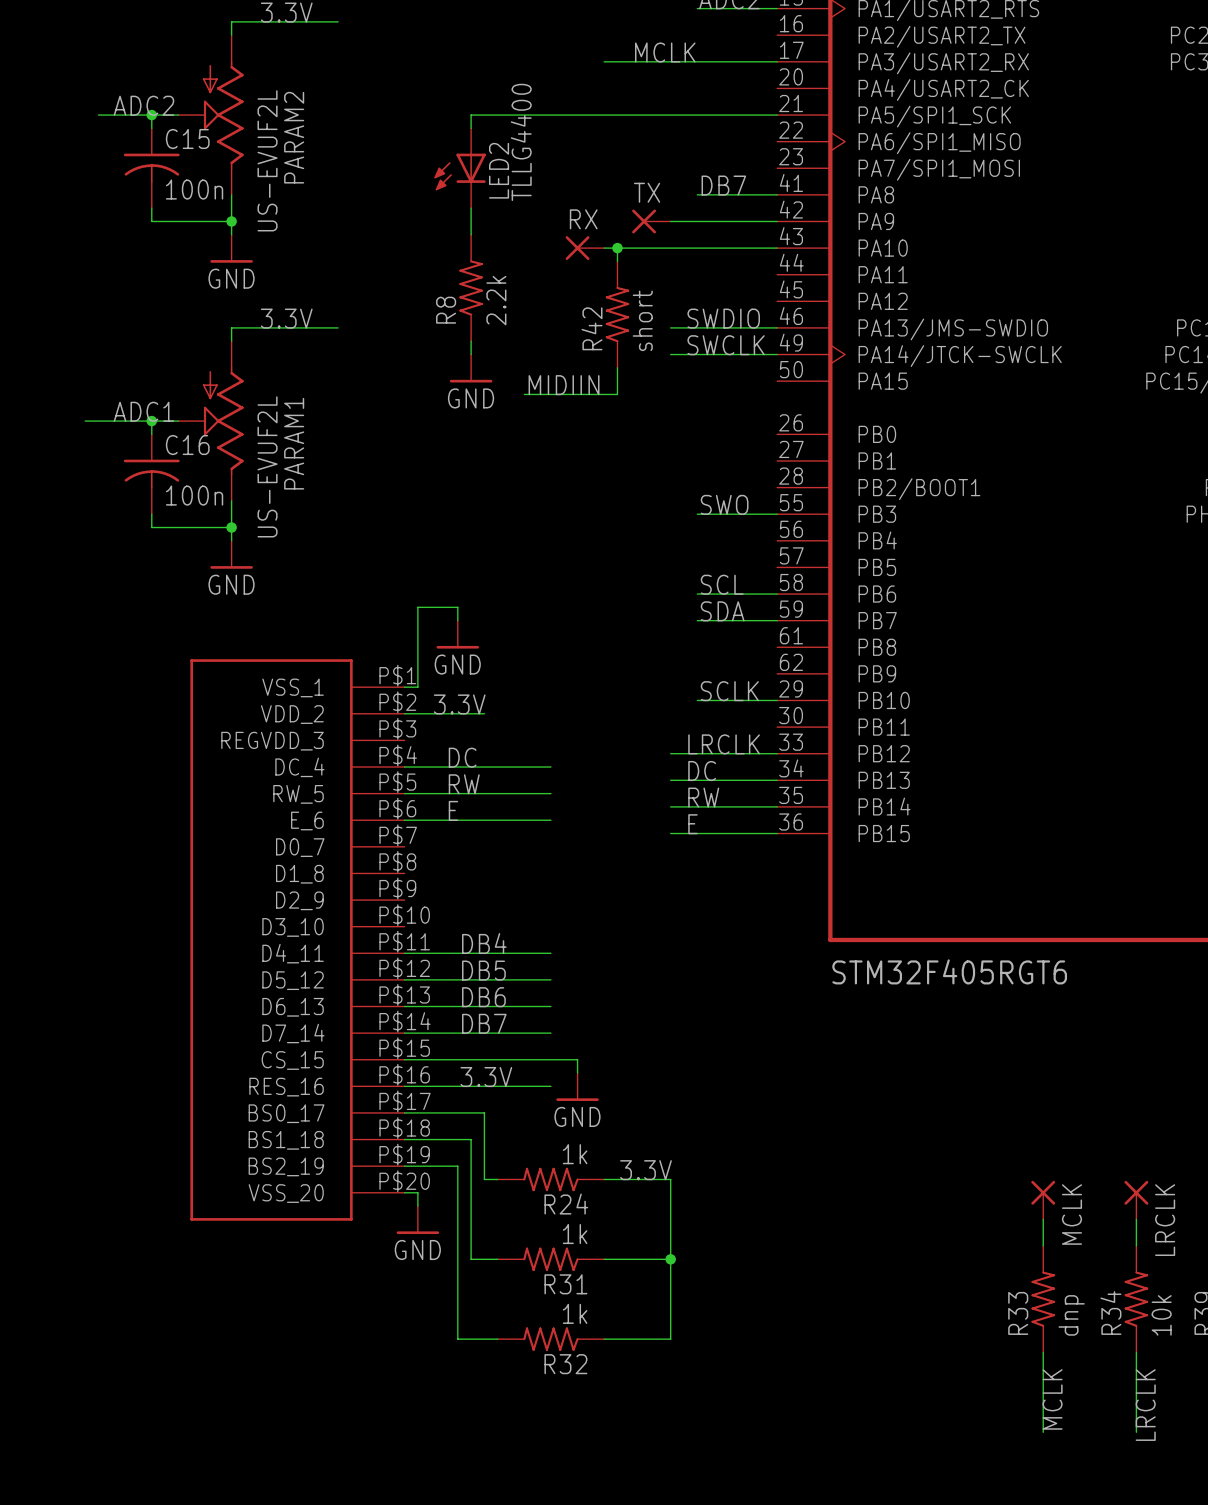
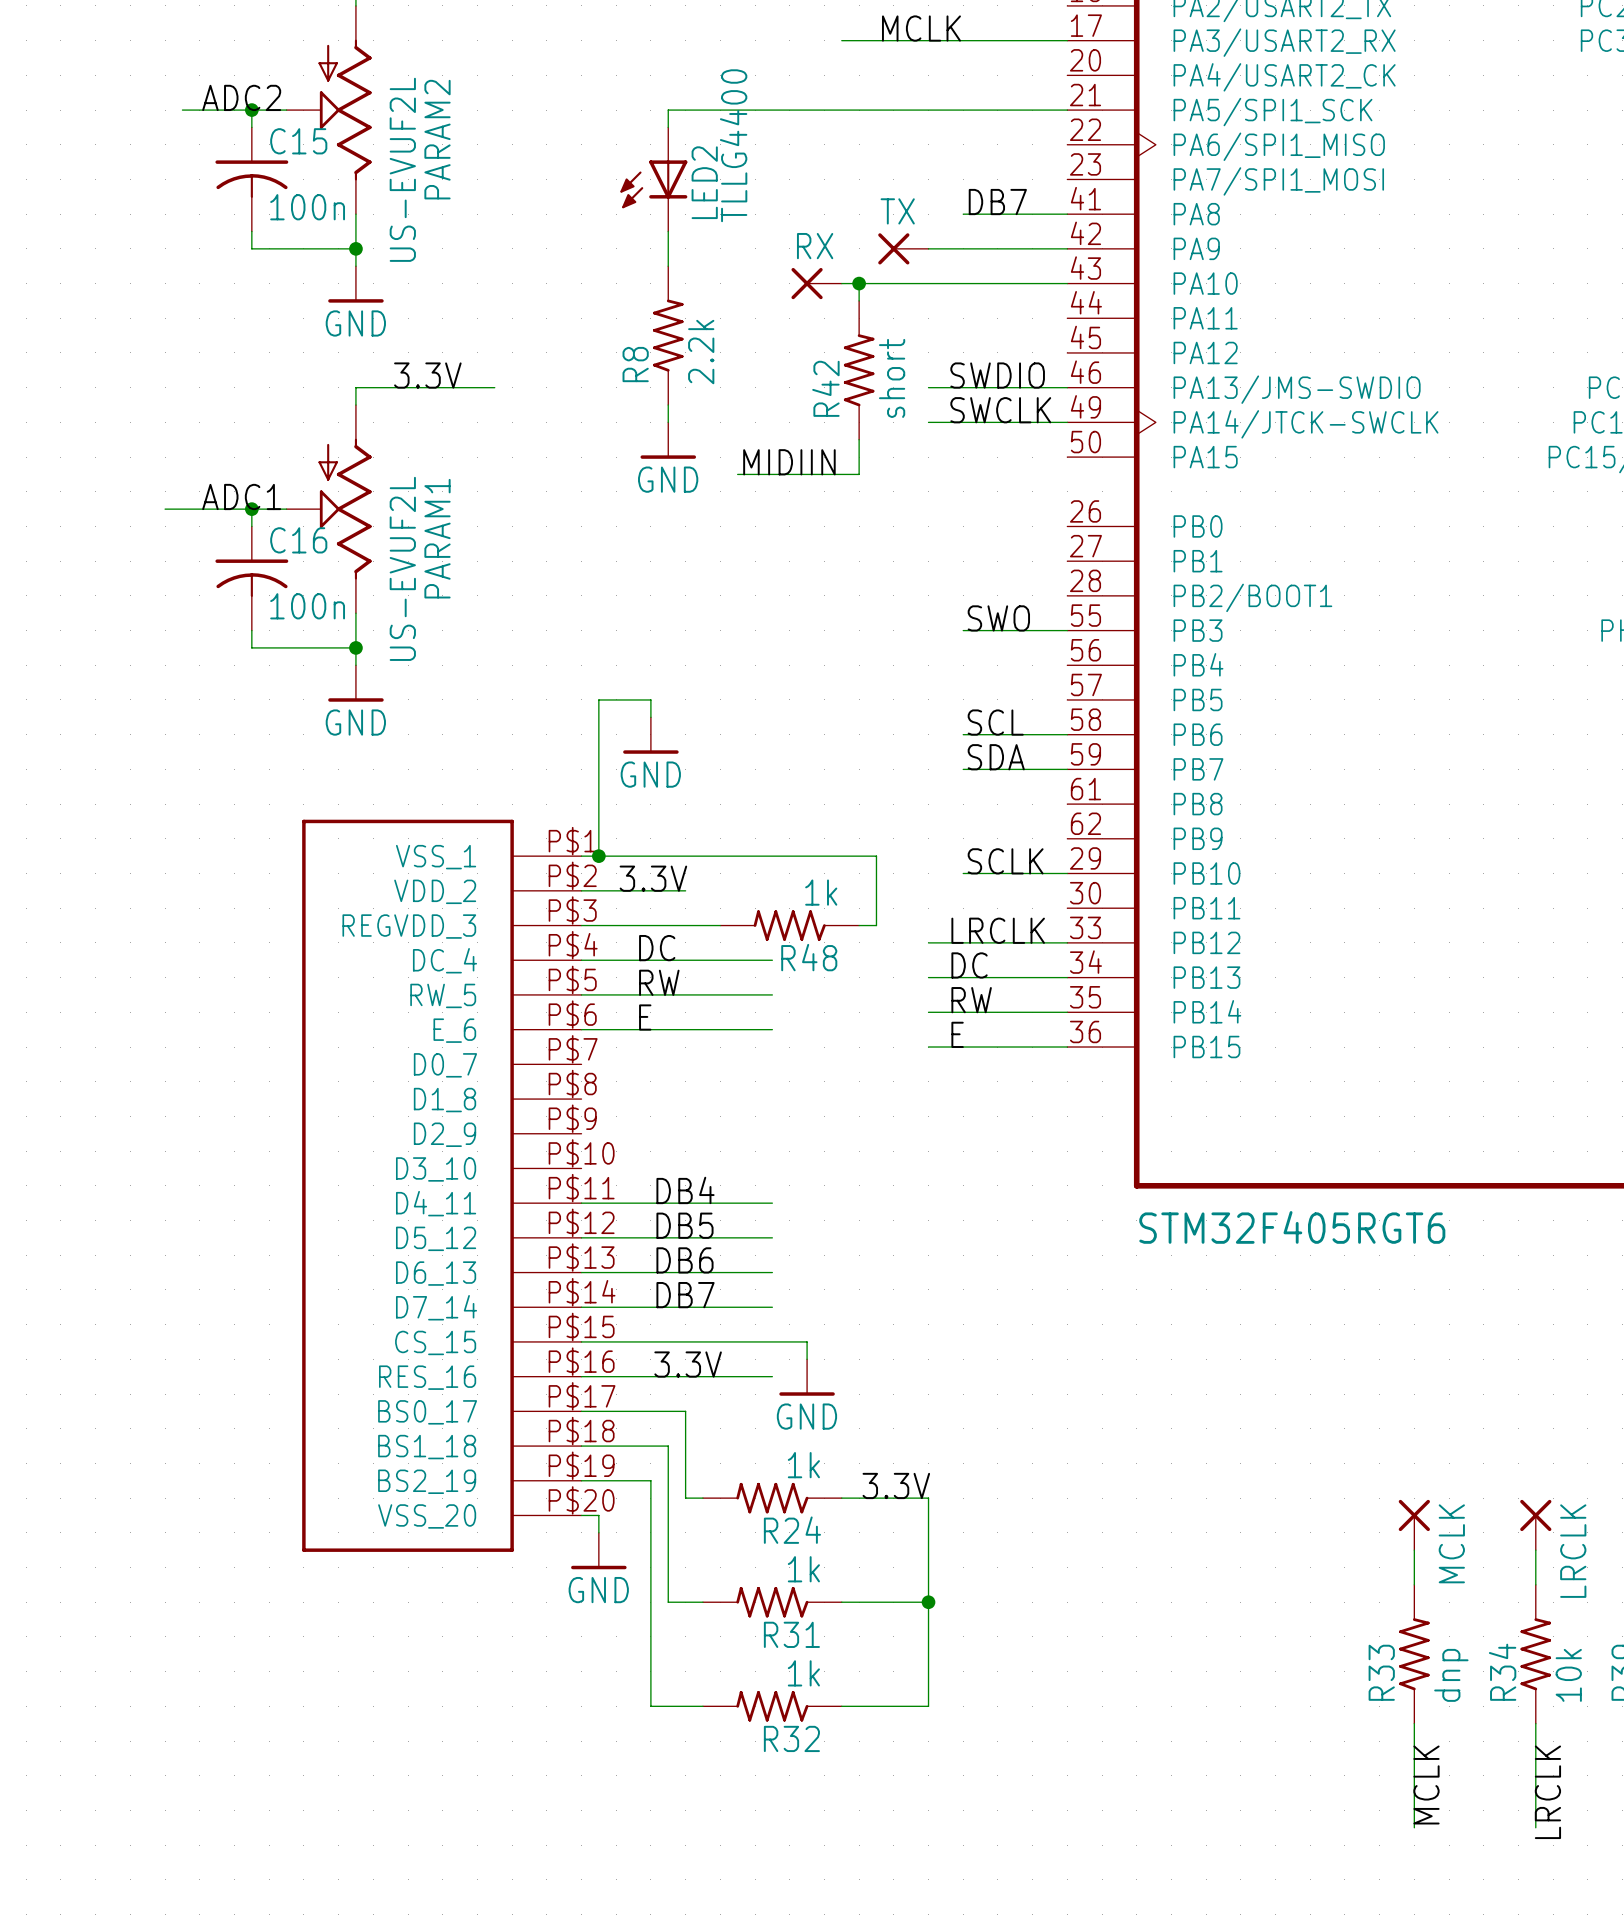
wire: (417, 607) (457, 607) (457, 620) -> (598, 752) (598, 699) (650, 699) (650, 717)
power symbol position: GND (457, 634) -> GND (650, 735)
wire: none -> (598, 856) (876, 856) (876, 925) (859, 925)
junction: none -> (598, 856)
wire: none -> (581, 925) (720, 925)
R48: none -> 1k (789, 925)

